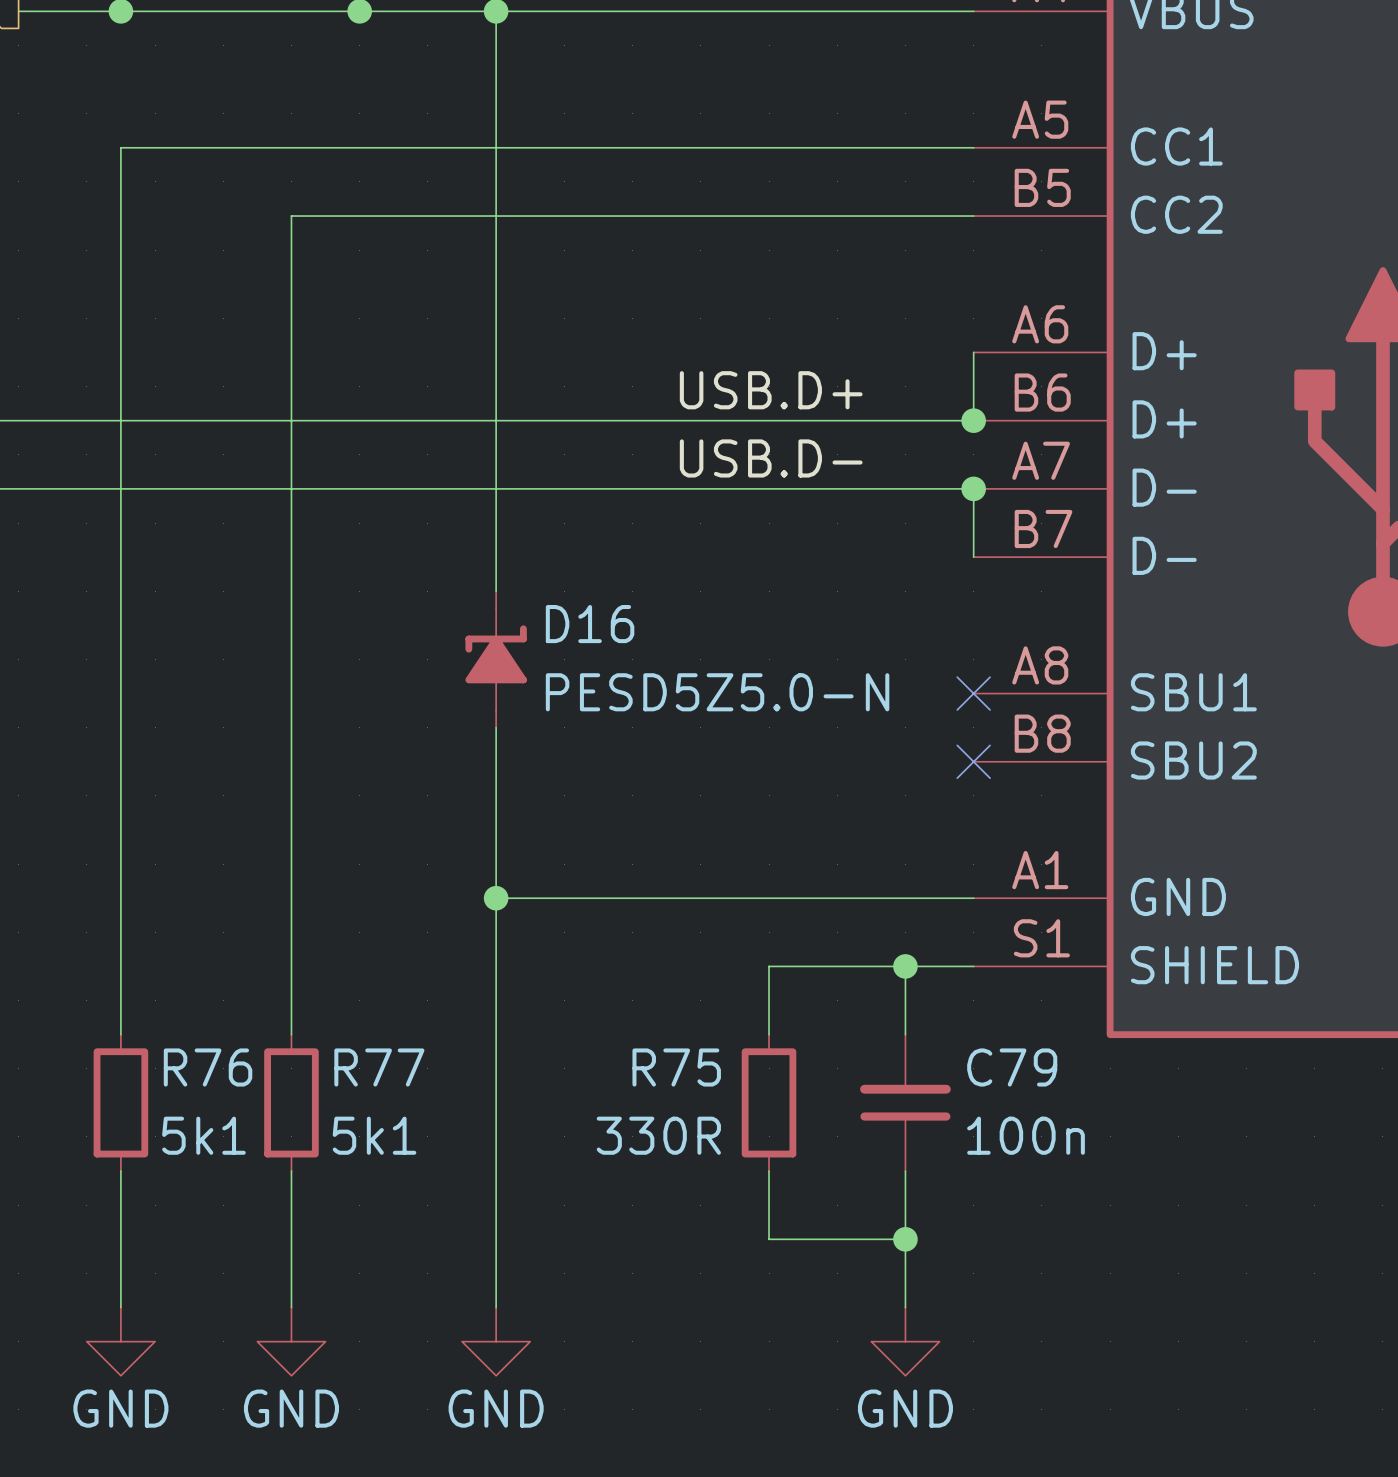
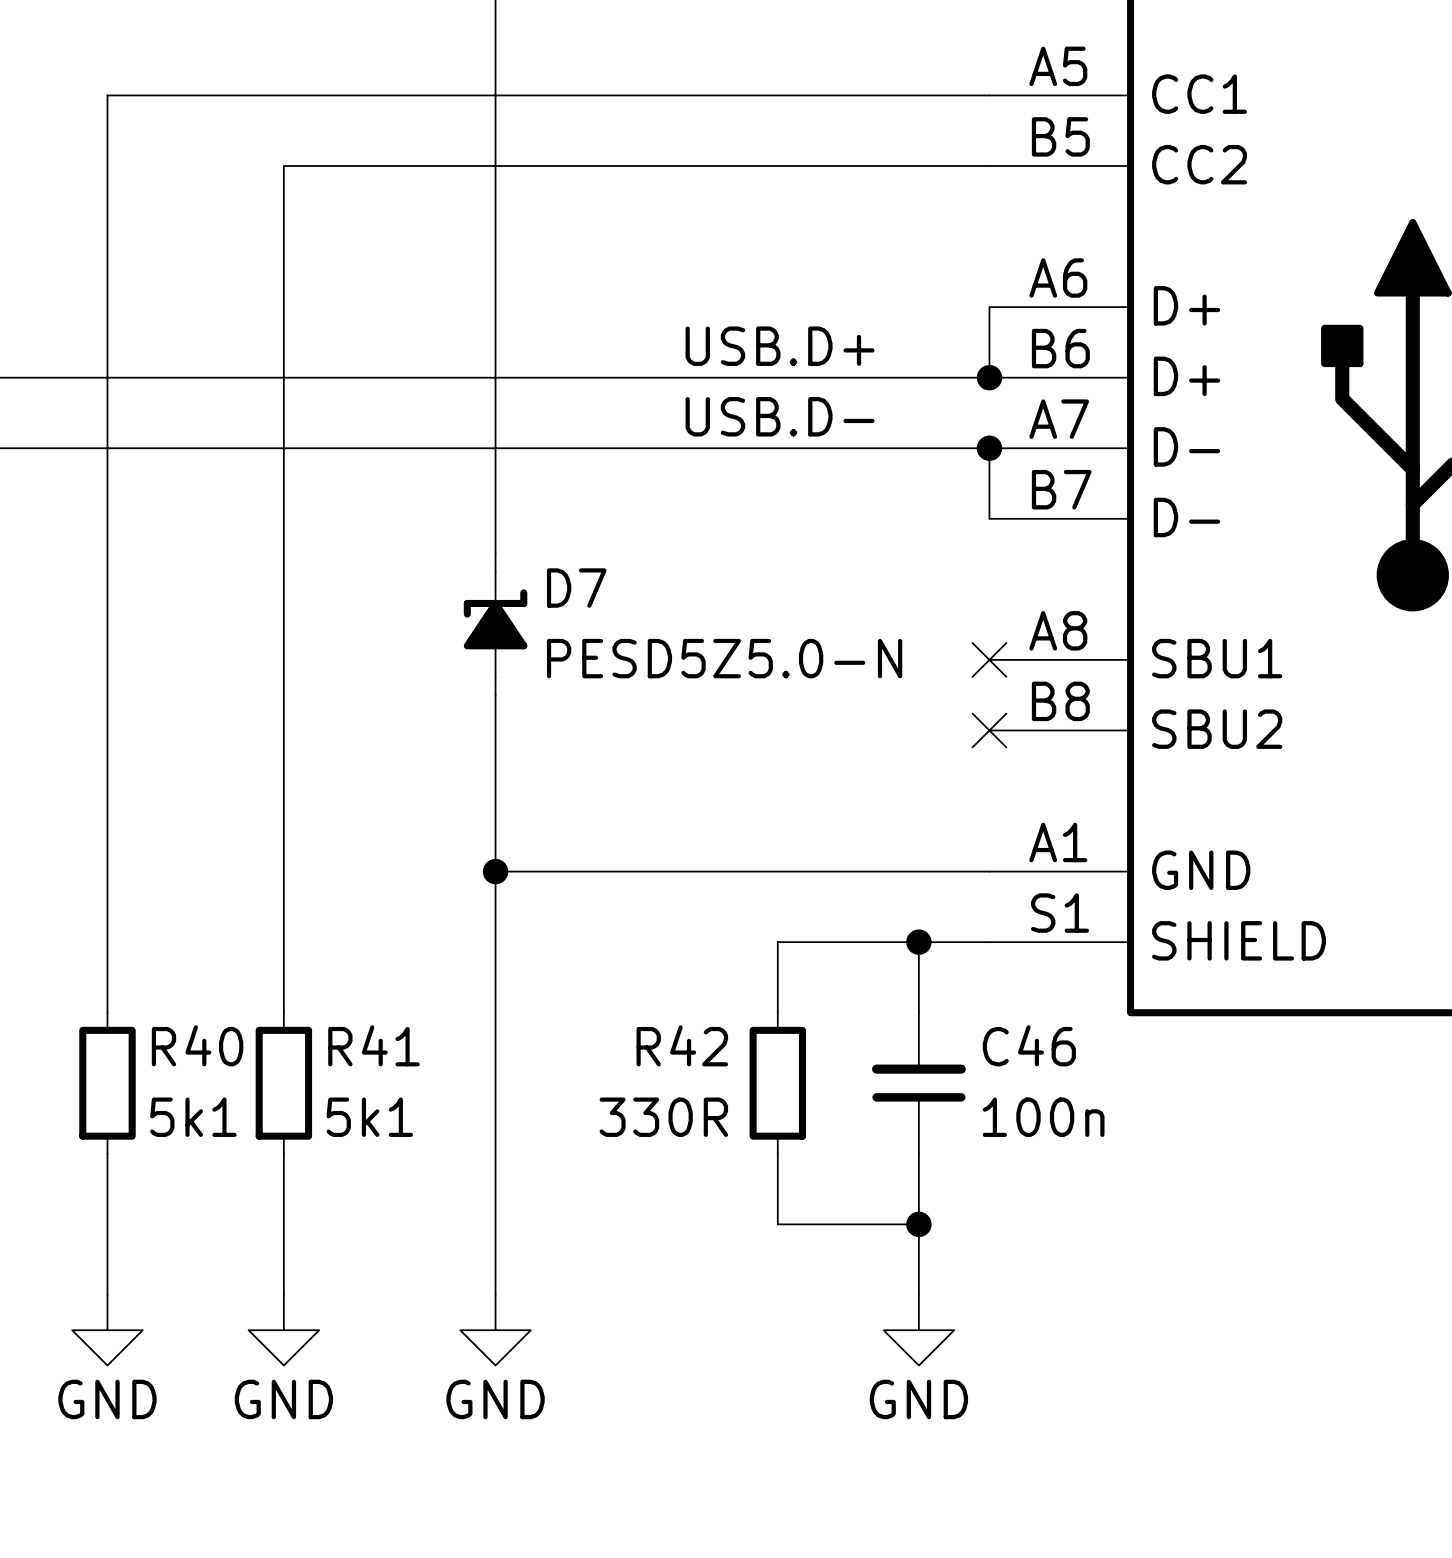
D16 name: D16 (590, 624) -> D7 (576, 588)
R76 name: R76 (208, 1067) -> R40 (197, 1045)
R77 name: R77 (379, 1067) -> R41 (373, 1045)
R75 name: R75 (676, 1067) -> R42 (682, 1045)
C79 name: C79 (1012, 1067) -> C46 (1029, 1045)

